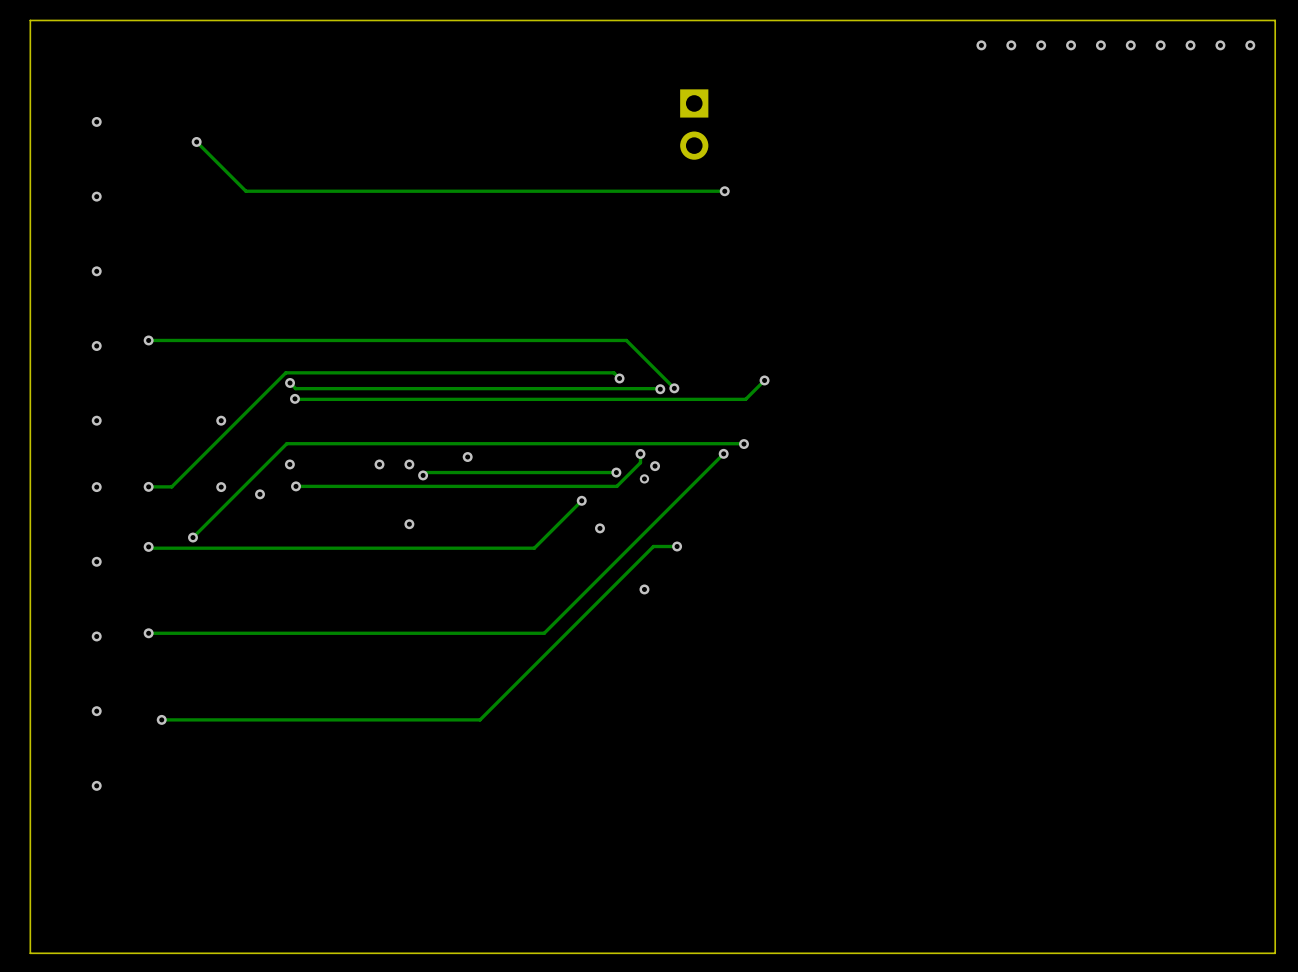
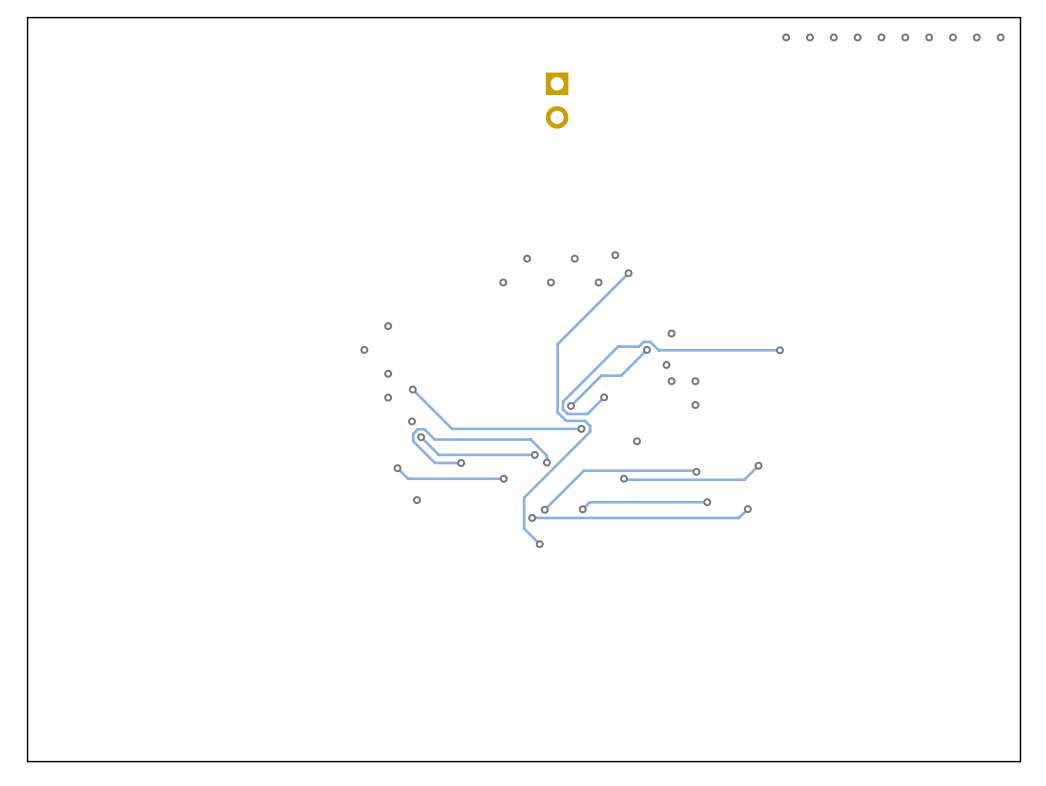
via: (96, 121) -> none
track: (196, 141) (245, 191) (724, 191) -> none
via: (196, 141) -> none
via: (724, 191) -> none
via: (96, 196) -> none
via: (96, 271) -> none
via: none -> (615, 255)
via: none -> (527, 258)
via: none -> (574, 258)
track: (148, 340) (626, 340) (674, 388) -> none
via: (148, 340) -> none
track: none -> (628, 273) (557, 344) (557, 412) (566, 420) (585, 420) (590, 425) (590, 431) (524, 497) (524, 528) (539, 544)
via: none -> (628, 273)
via: (96, 346) -> none
via: none -> (503, 282)
via: none -> (550, 282)
via: none -> (598, 282)
track: (619, 378) (613, 372) (285, 372) (171, 486) (148, 486) -> none
via: (619, 378) -> none
track: (764, 380) (745, 399) (294, 398) -> none
via: (764, 380) -> none
track: (290, 382) (295, 388) (660, 389) -> none
via: (290, 382) -> none
via: (674, 388) -> none
via: (660, 389) -> none
via: (294, 398) -> none
via: none -> (388, 326)
via: none -> (671, 333)
via: (96, 420) -> none
via: (221, 420) -> none
via: none -> (364, 349)
track: none -> (646, 349) (621, 375) (601, 375) (570, 406)
via: none -> (646, 349)
track: none -> (779, 350) (658, 350) (650, 341) (643, 341) (638, 346) (618, 346) (562, 401) (562, 409) (567, 414) (587, 414) (604, 397)
via: none -> (779, 350)
track: (743, 444) (286, 443) (192, 537) -> none
via: (743, 444) -> none
track: (640, 453) (640, 462) (616, 486) (296, 486) -> none
via: (640, 453) -> none
track: (723, 453) (544, 633) (148, 633) -> none
via: (723, 453) -> none
via: none -> (666, 364)
via: (467, 457) -> none
via: (289, 464) -> none
via: (379, 464) -> none
via: (409, 464) -> none
via: (655, 466) -> none
via: none -> (388, 373)
track: (616, 472) (425, 472) (423, 475) -> none
via: (616, 472) -> none
via: (423, 475) -> none
via: none -> (671, 381)
via: none -> (695, 381)
via: (644, 478) -> none
via: (148, 486) -> none
via: (296, 486) -> none
track: none -> (412, 389) (452, 428) (581, 428)
via: none -> (412, 389)
via: (96, 487) -> none
via: (221, 487) -> none
via: (260, 494) -> none
via: none -> (388, 397)
via: none -> (604, 397)
track: (581, 500) (534, 548) (148, 546) -> none
via: (581, 500) -> none
via: none -> (695, 405)
via: none -> (570, 406)
via: (409, 524) -> none
via: none -> (411, 421)
via: (599, 528) -> none
via: none -> (581, 428)
via: (192, 537) -> none
via: (148, 546) -> none
track: none -> (421, 437) (438, 454) (534, 454)
via: none -> (421, 437)
track: (677, 546) (653, 546) (480, 719) (161, 719) -> none
via: (677, 546) -> none
via: none -> (636, 441)
via: (96, 561) -> none
via: none -> (534, 454)
via: none -> (461, 462)
track: none -> (546, 462) (546, 455) (530, 439) (434, 439) (424, 429) (417, 429) (413, 433) (413, 441) (435, 462) (461, 462)
via: none -> (546, 462)
track: none -> (758, 465) (744, 479) (623, 478)
via: none -> (758, 465)
track: none -> (397, 468) (408, 478) (503, 478)
via: none -> (397, 468)
via: (644, 589) -> none
track: none -> (696, 471) (583, 470) (544, 509)
via: none -> (696, 471)
via: none -> (503, 478)
via: none -> (623, 478)
via: none -> (416, 500)
track: none -> (707, 502) (589, 502) (582, 509)
via: none -> (707, 502)
via: (148, 633) -> none
via: (96, 636) -> none
via: none -> (582, 509)
track: none -> (747, 509) (738, 517) (532, 517)
via: none -> (747, 509)
via: none -> (544, 509)
via: none -> (532, 517)
via: none -> (539, 544)
via: (96, 711) -> none
via: (161, 719) -> none
via: (96, 785) -> none

